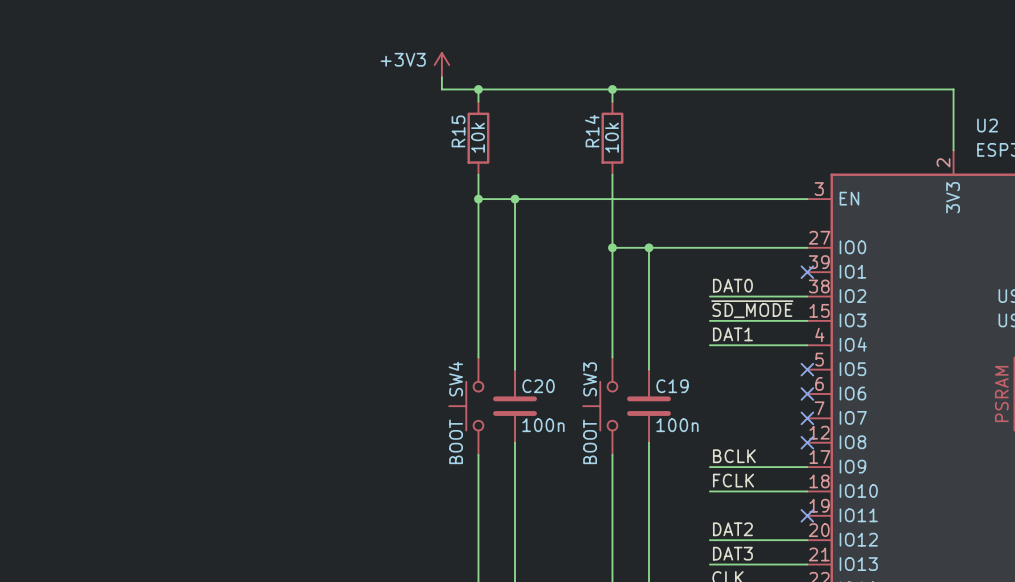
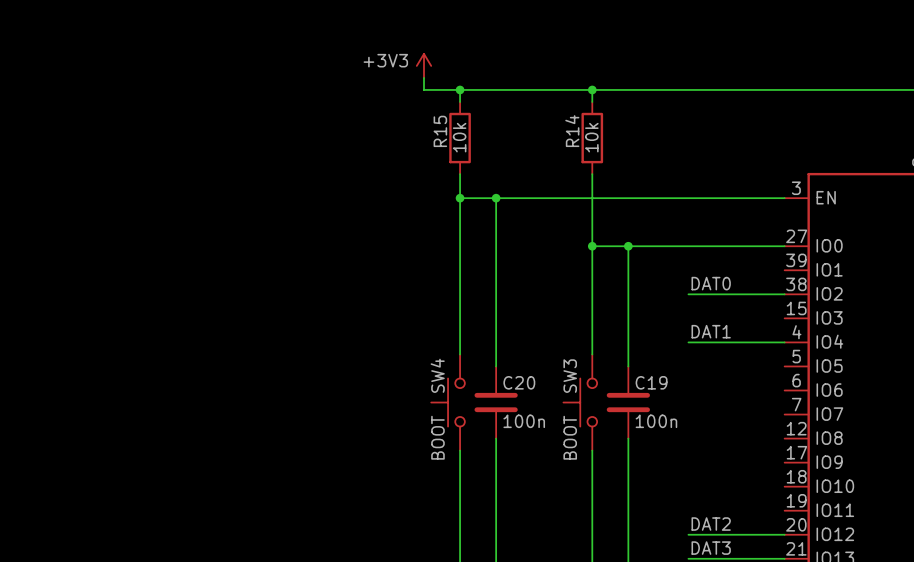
no-connect mark: (807, 272) -> none
label: ~{SD_MODE} (752, 309) -> none
wire: (709, 320) (807, 320) -> none
no-connect mark: (807, 369) -> none
no-connect mark: (807, 393) -> none
no-connect mark: (807, 418) -> none
no-connect mark: (807, 442) -> none
label: BCLK (734, 456) -> none
wire: (709, 467) (807, 467) -> none
label: FCLK (733, 480) -> none
wire: (709, 491) (807, 491) -> none
no-connect mark: (807, 515) -> none

